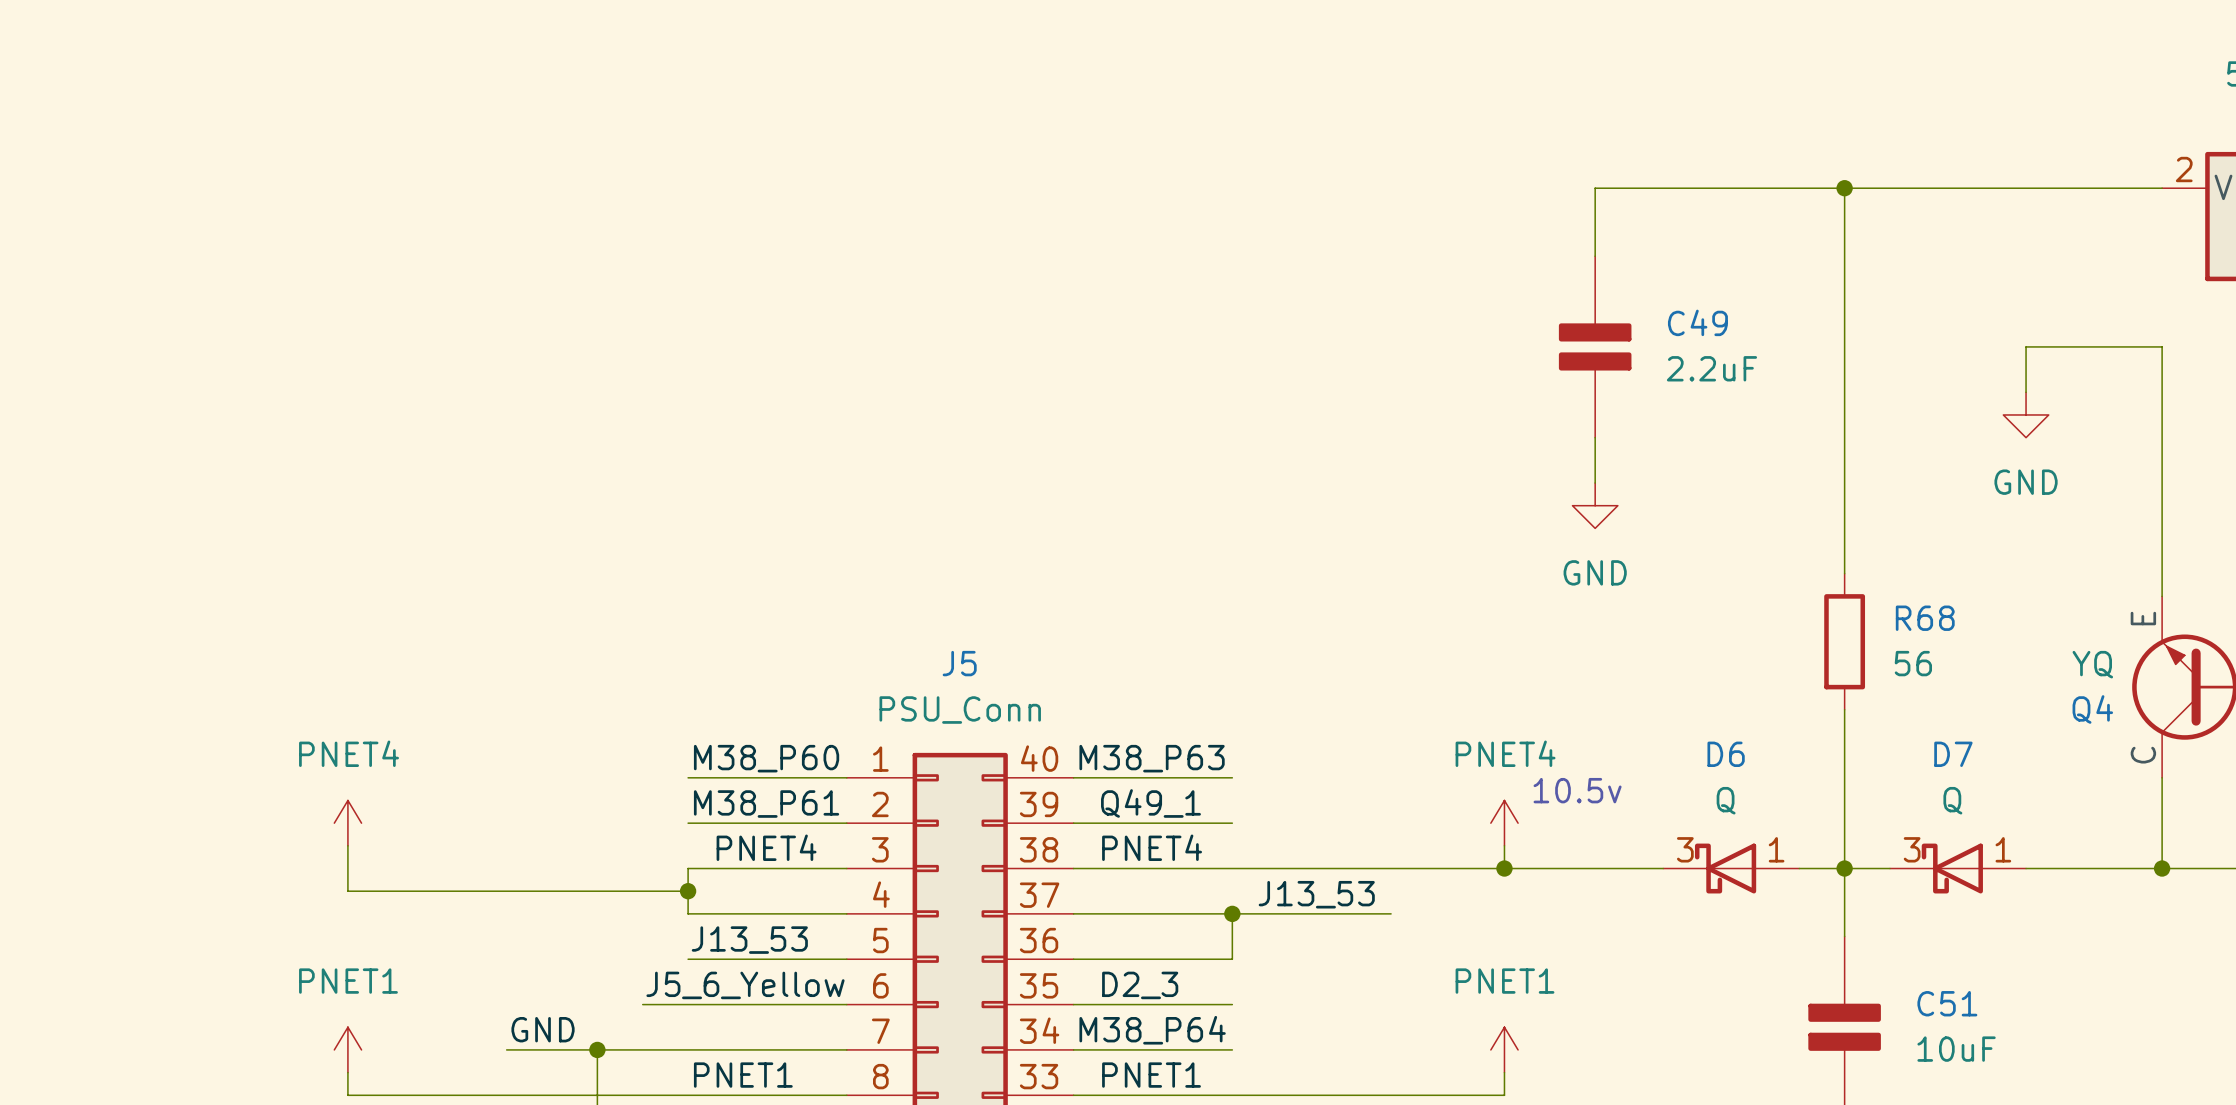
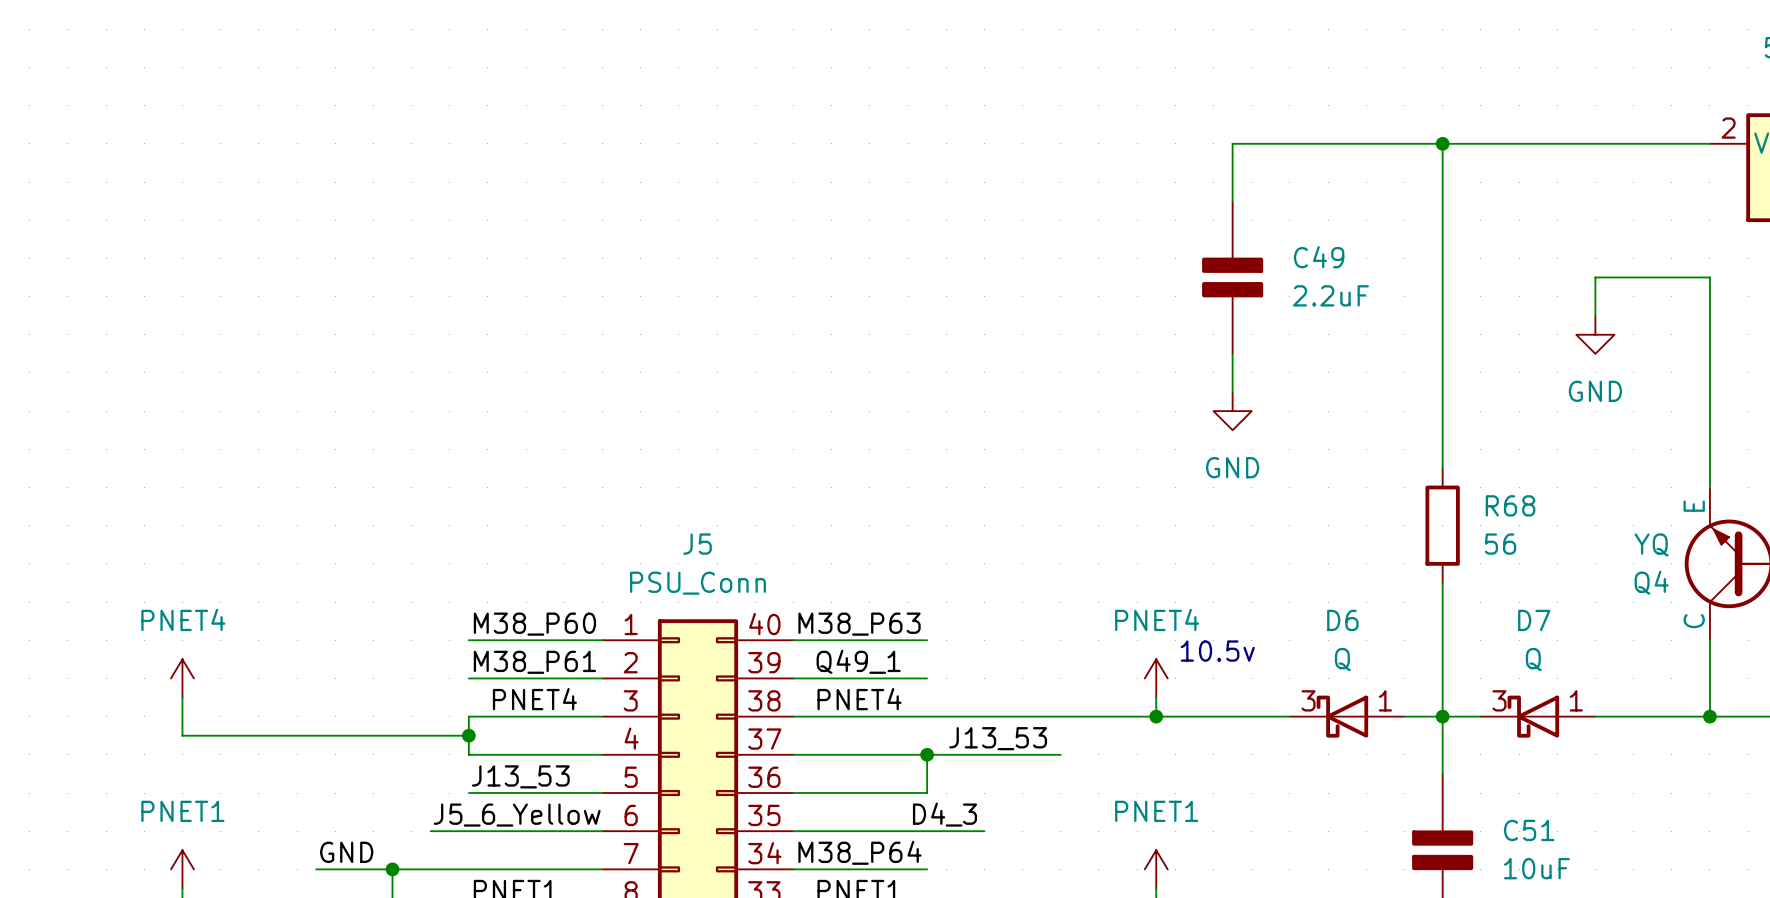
label: none -> D4_3 (944, 814)
label: D2_3 (1140, 985) -> none
wire: none -> (927, 831) (984, 831)

